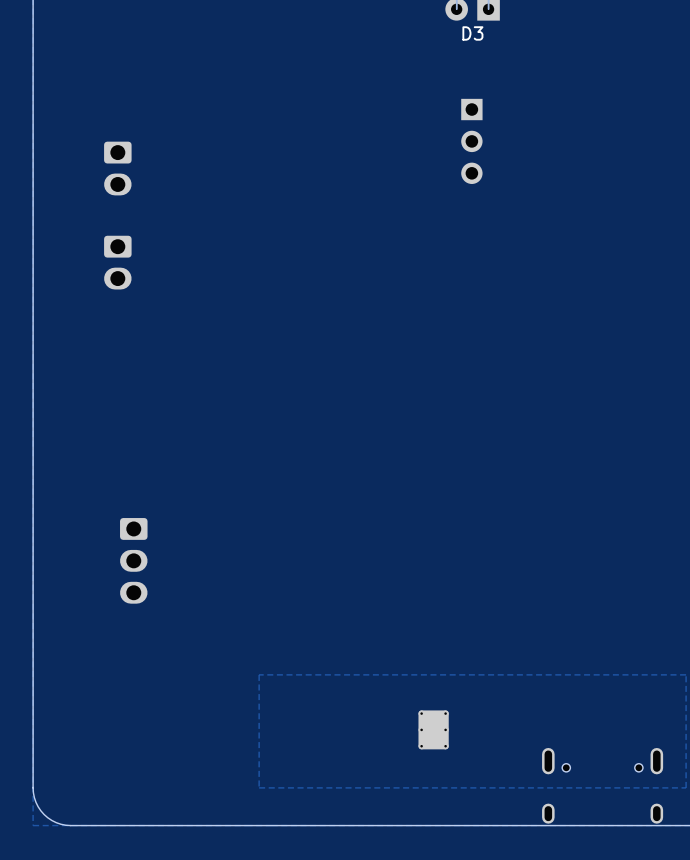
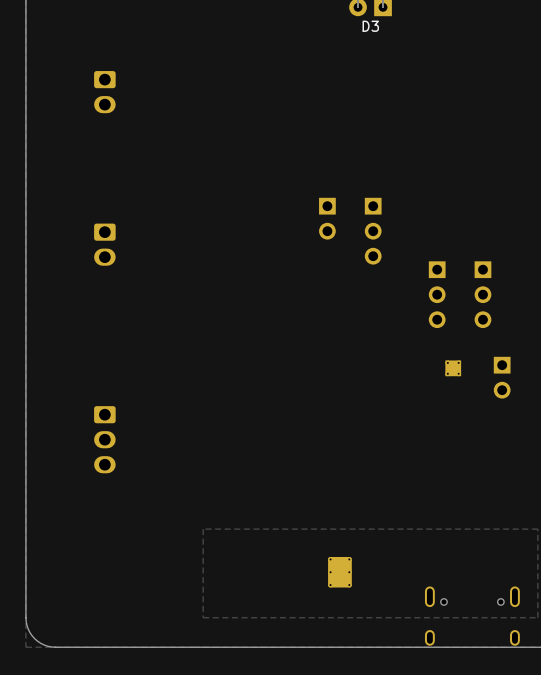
part: (471, 141) -> none
part position: (117, 168) -> (104, 92)
part position: (117, 262) -> (104, 244)
part: none -> (327, 218)
part: none -> (373, 231)
part: none -> (437, 294)
part: none -> (482, 294)
part: none -> (453, 368)
part: none -> (502, 377)

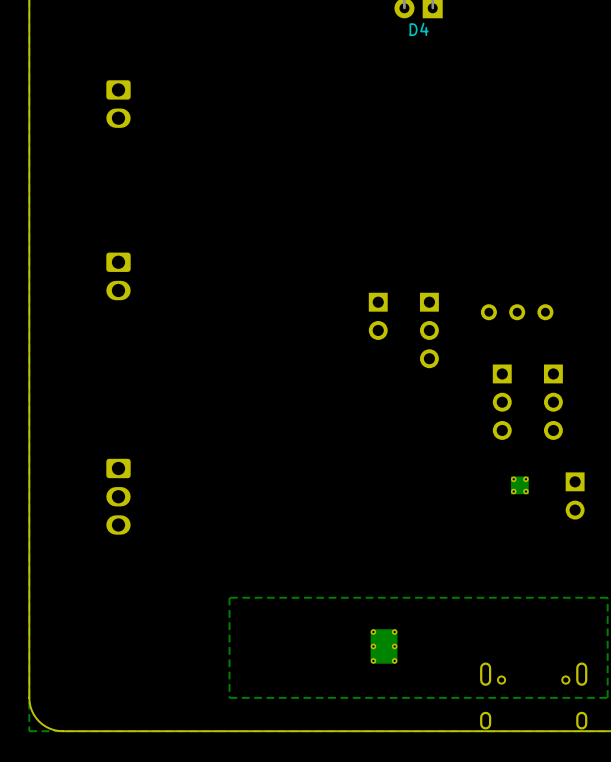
D3 name: D3 (370, 26) -> D4 (419, 29)
part position: (327, 218) -> (378, 316)
part: (373, 231) -> none
part: none -> (517, 312)
part: none -> (429, 330)
part: (437, 294) -> none
part: (482, 294) -> none
part: none -> (502, 402)
part: none -> (553, 402)
part position: (453, 368) -> (519, 485)
part position: (502, 377) -> (575, 495)

